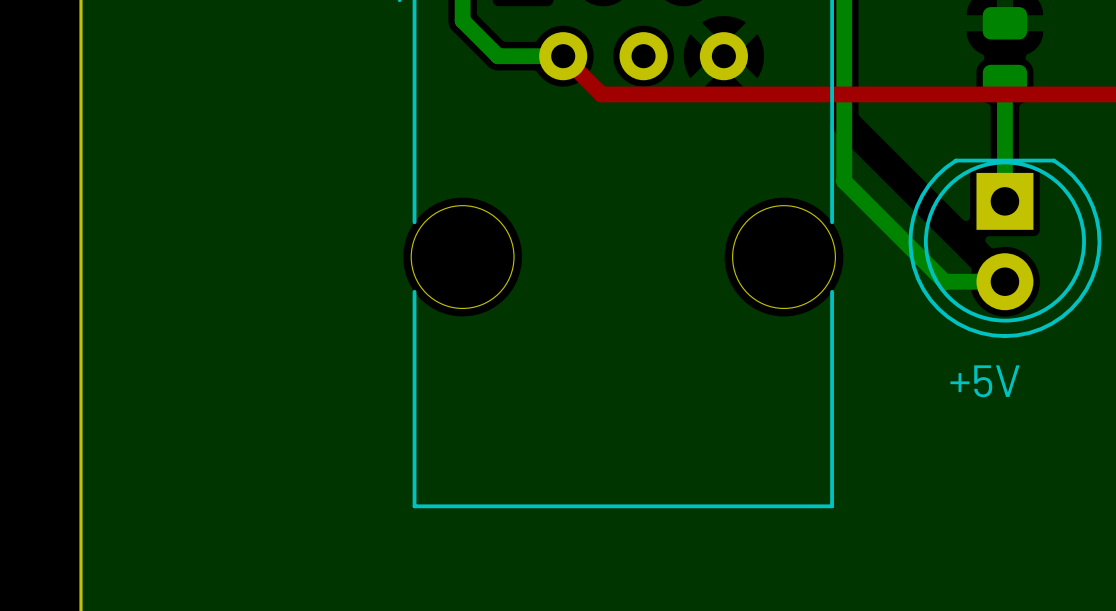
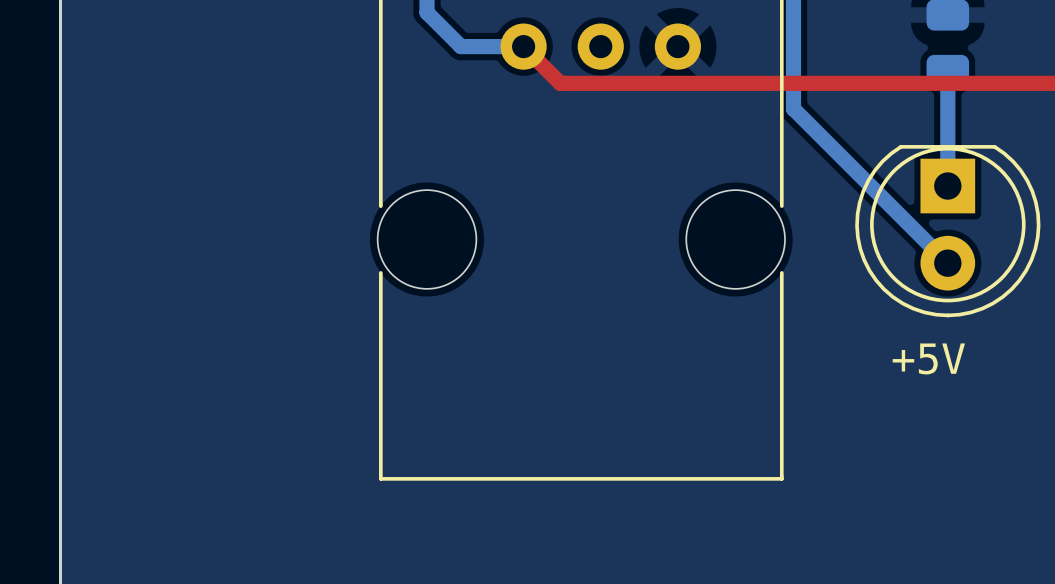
bottom track: (844, 121) (844, 181) (944, 281) (1004, 281) -> (793, 108) (947, 263)

